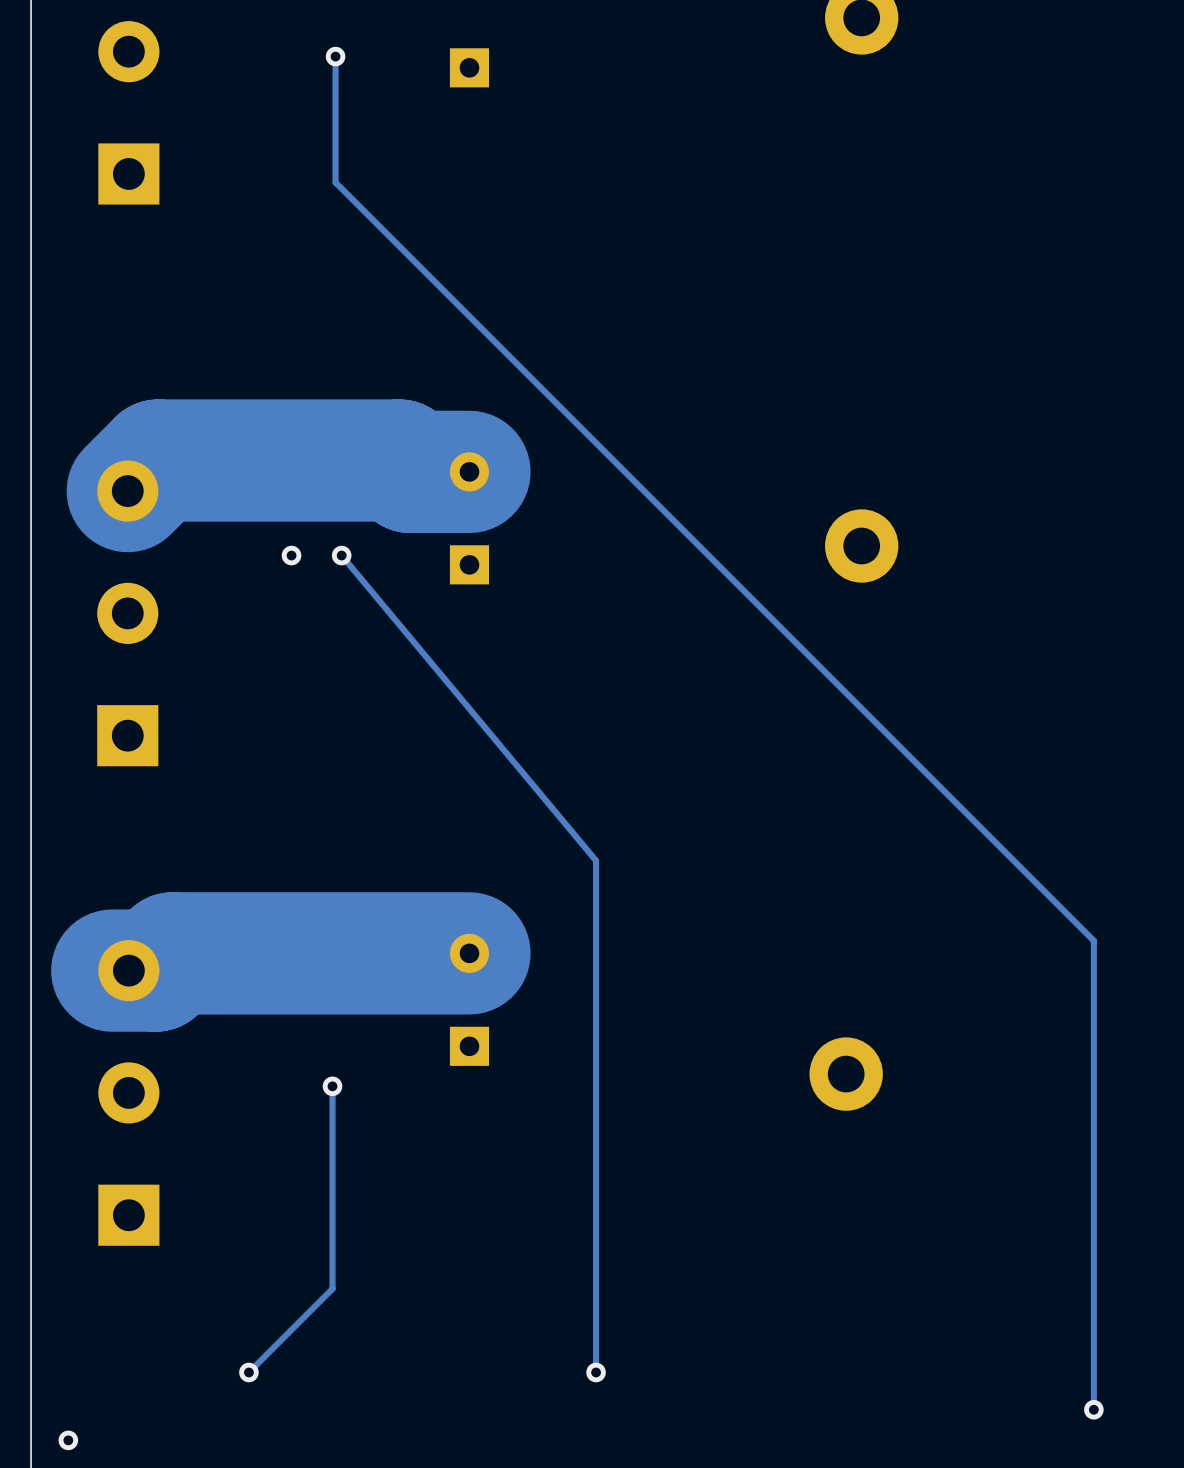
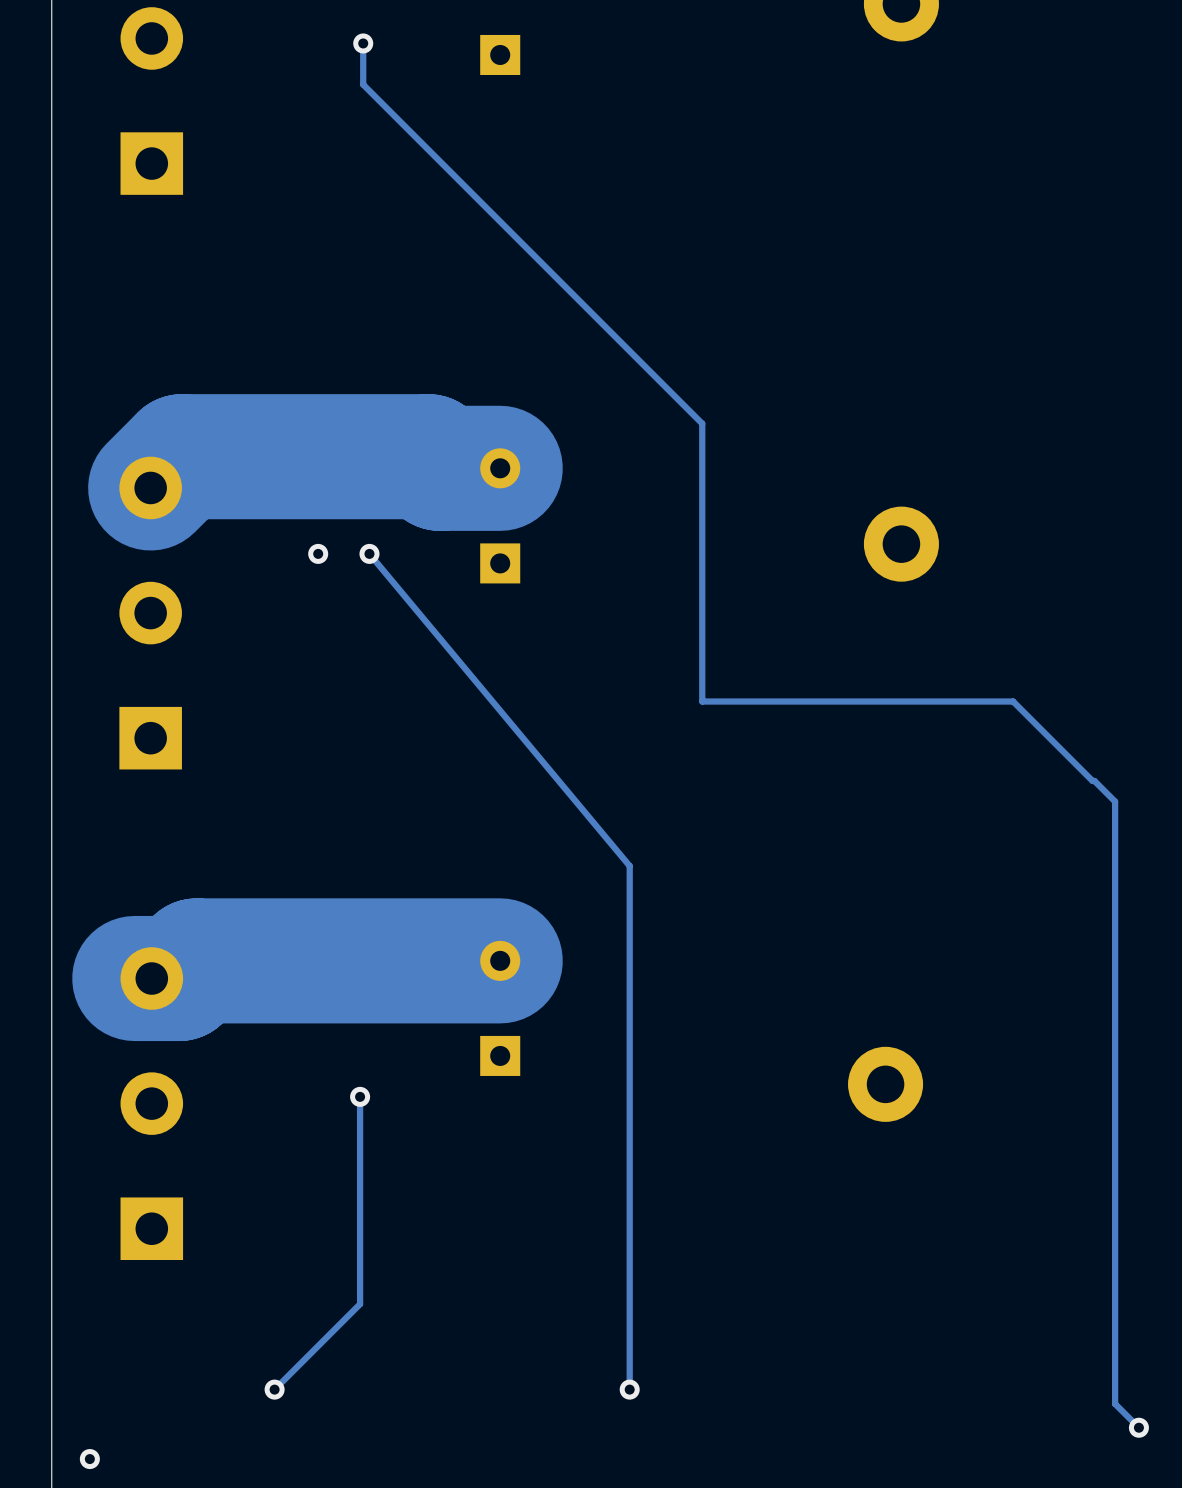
track: (335, 96) (335, 182) (1093, 940) (1093, 1409) -> (363, 84) (702, 423) (702, 701) (1013, 701) (1115, 801) (1115, 1403) (1138, 1427)

